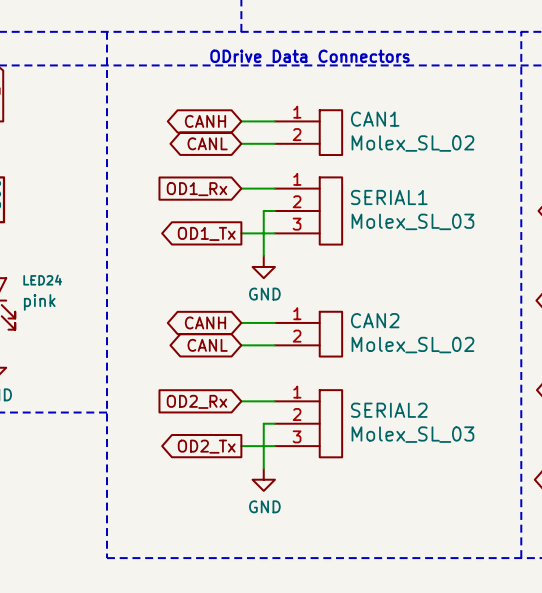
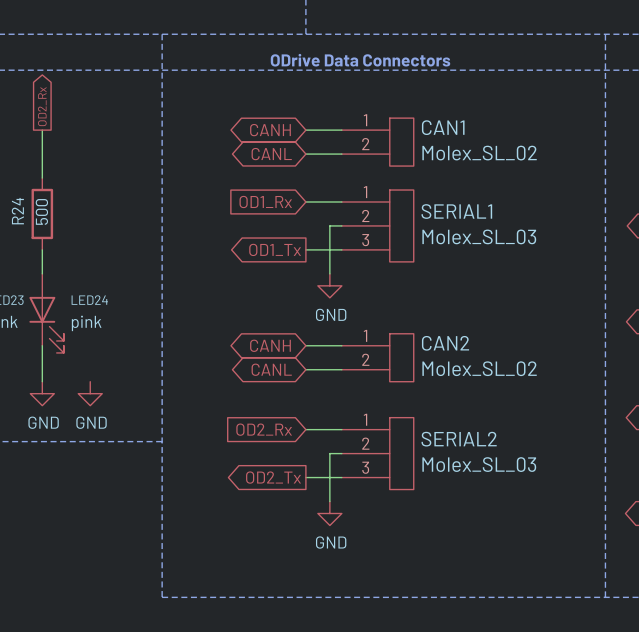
power symbol: none -> GND (90, 393)

